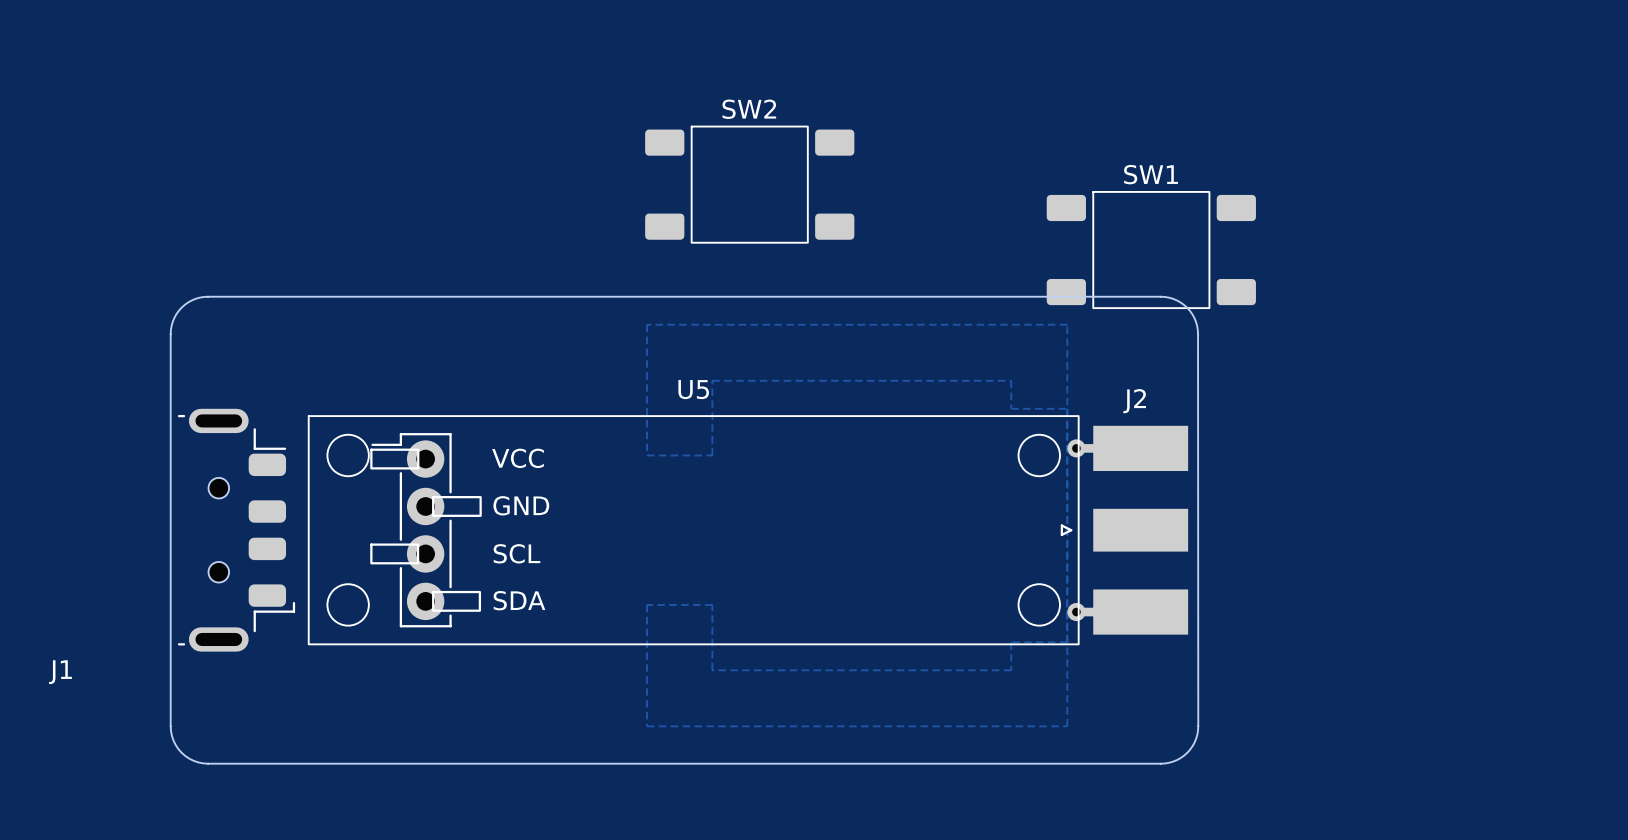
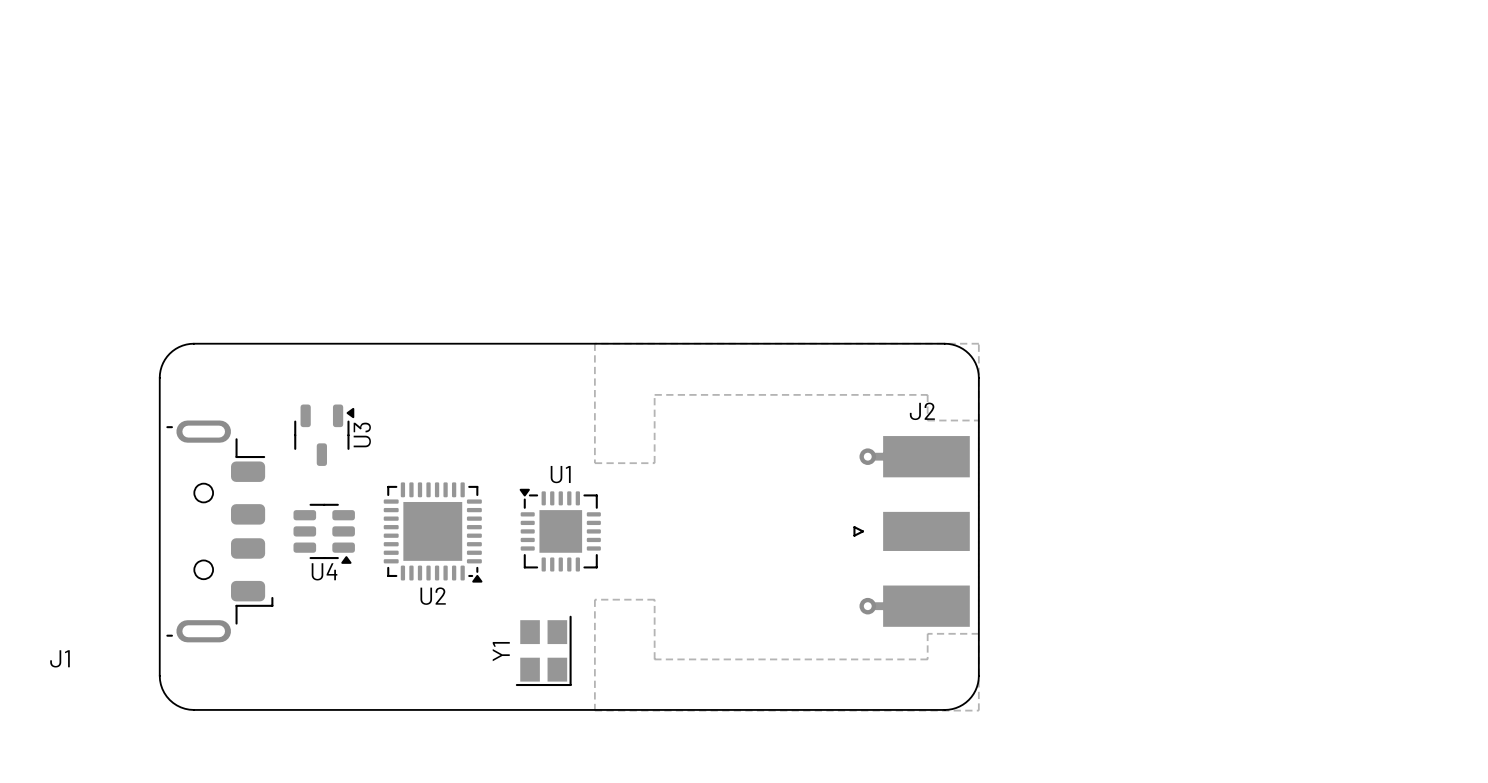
SW2: (749, 184) -> none
SW1: (1151, 250) -> none
board edge: (170, 362) (170, 329) (174, 317) (188, 302) (203, 296) (1160, 296) (1173, 298) (1189, 310) (1197, 329) (1198, 726) (1196, 738) (1187, 752) (1173, 761) (1160, 763) (208, 763) (189, 758) (175, 745) (171, 731) (170, 688) -> (159, 377) (163, 363) (169, 353) (179, 347) (193, 343) (944, 343) (956, 345) (968, 353) (976, 366) (978, 377) (978, 679) (971, 697) (956, 708) (944, 709) (193, 709) (180, 707) (169, 699) (162, 688) (159, 675)
U3: none -> (324, 435)
U1: none -> (560, 530)
U5: (693, 530) -> none
J2 position: (1124, 530) -> (911, 531)
U2: none -> (433, 532)
U4: none -> (324, 533)
Y1: none -> (543, 650)

